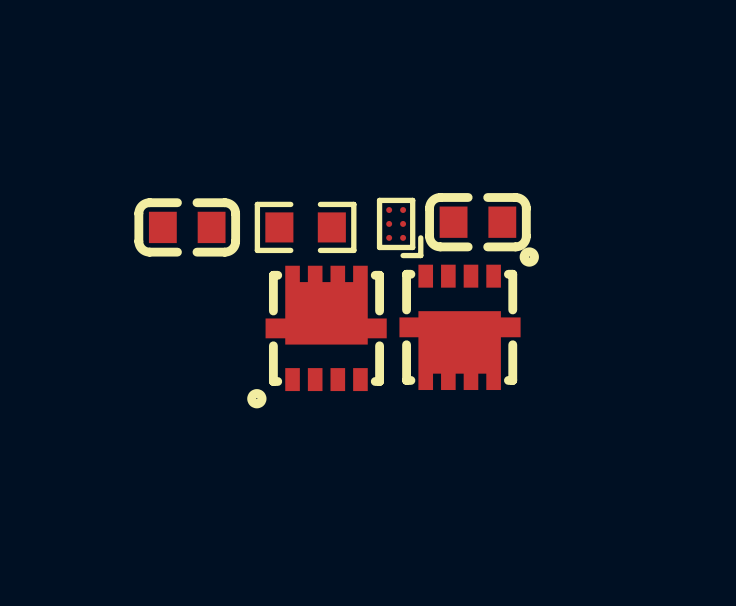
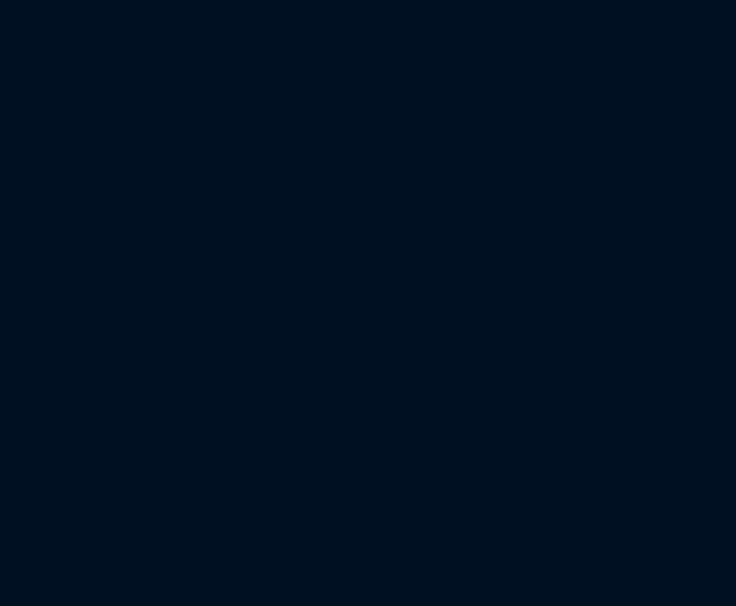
part: (477, 222) -> none
part: (187, 227) -> none
part: (305, 227) -> none
part: (400, 227) -> none
part: (469, 318) -> none
part: (316, 337) -> none

